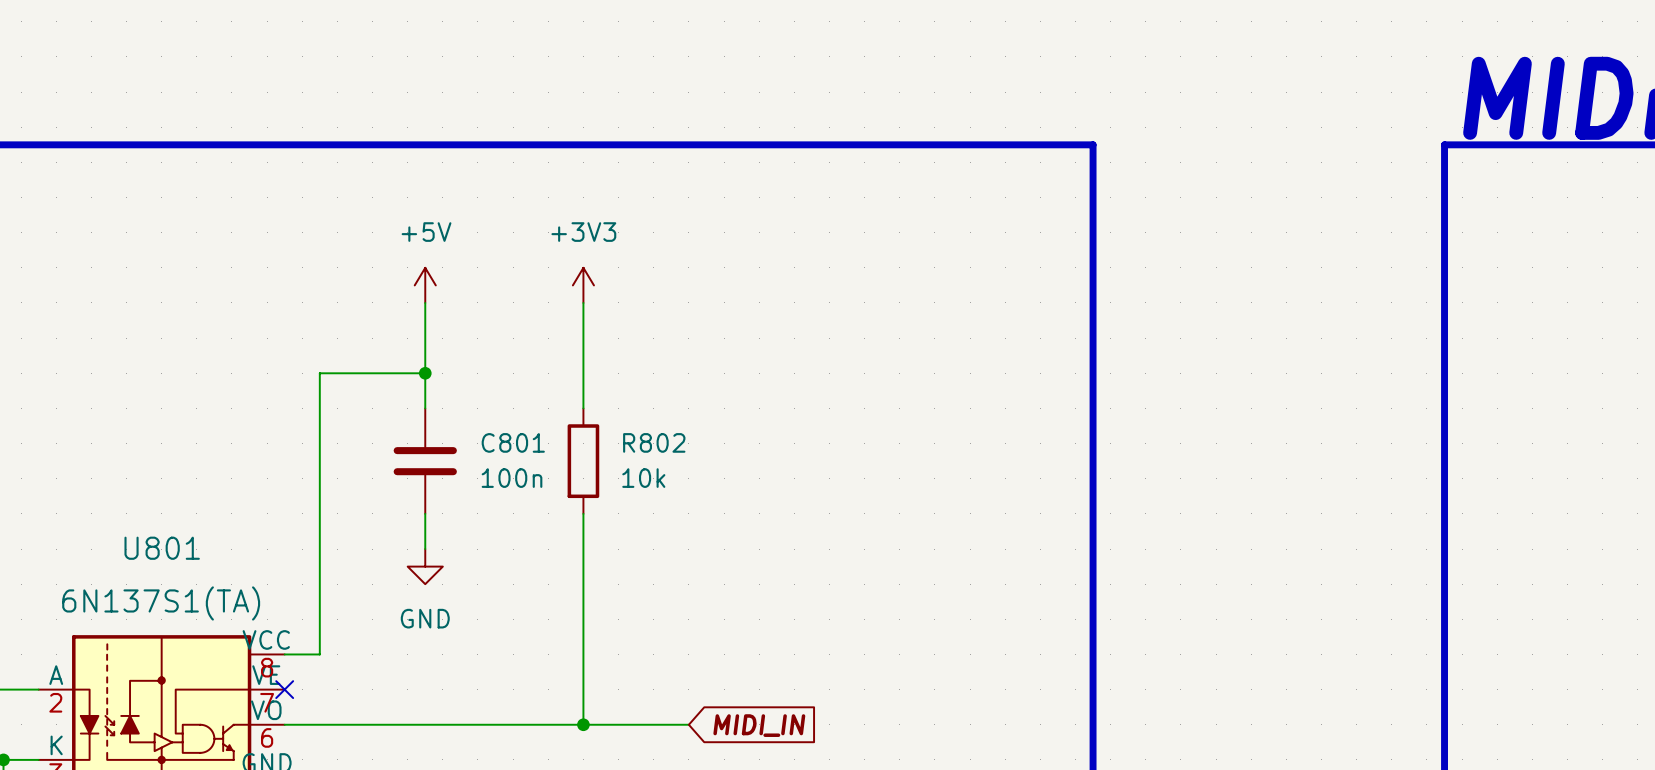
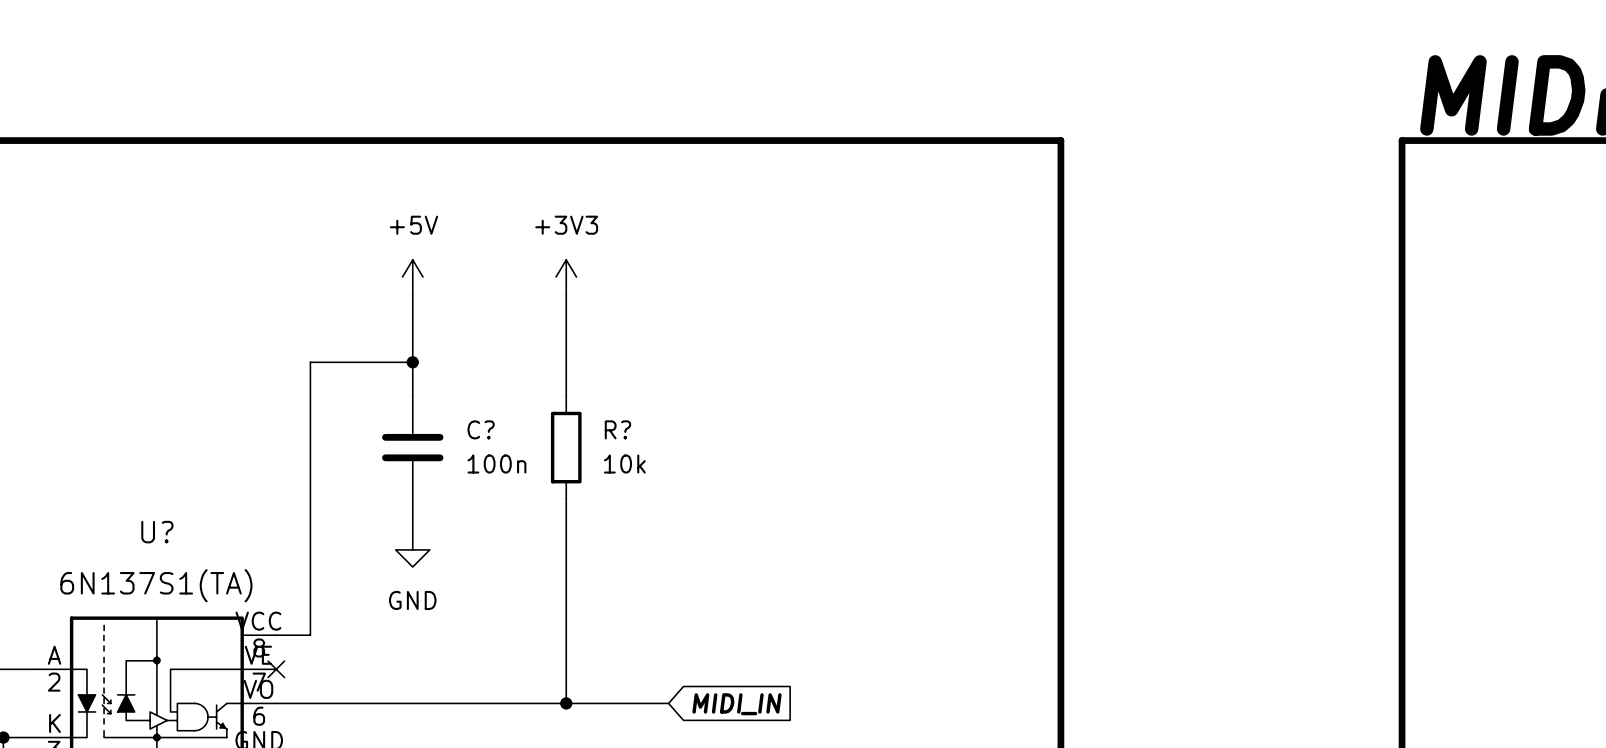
C801 name: C801 (513, 442) -> C? (481, 429)
R802 name: R802 (654, 442) -> R? (617, 429)
U801 name: U801 (162, 548) -> U? (157, 532)

